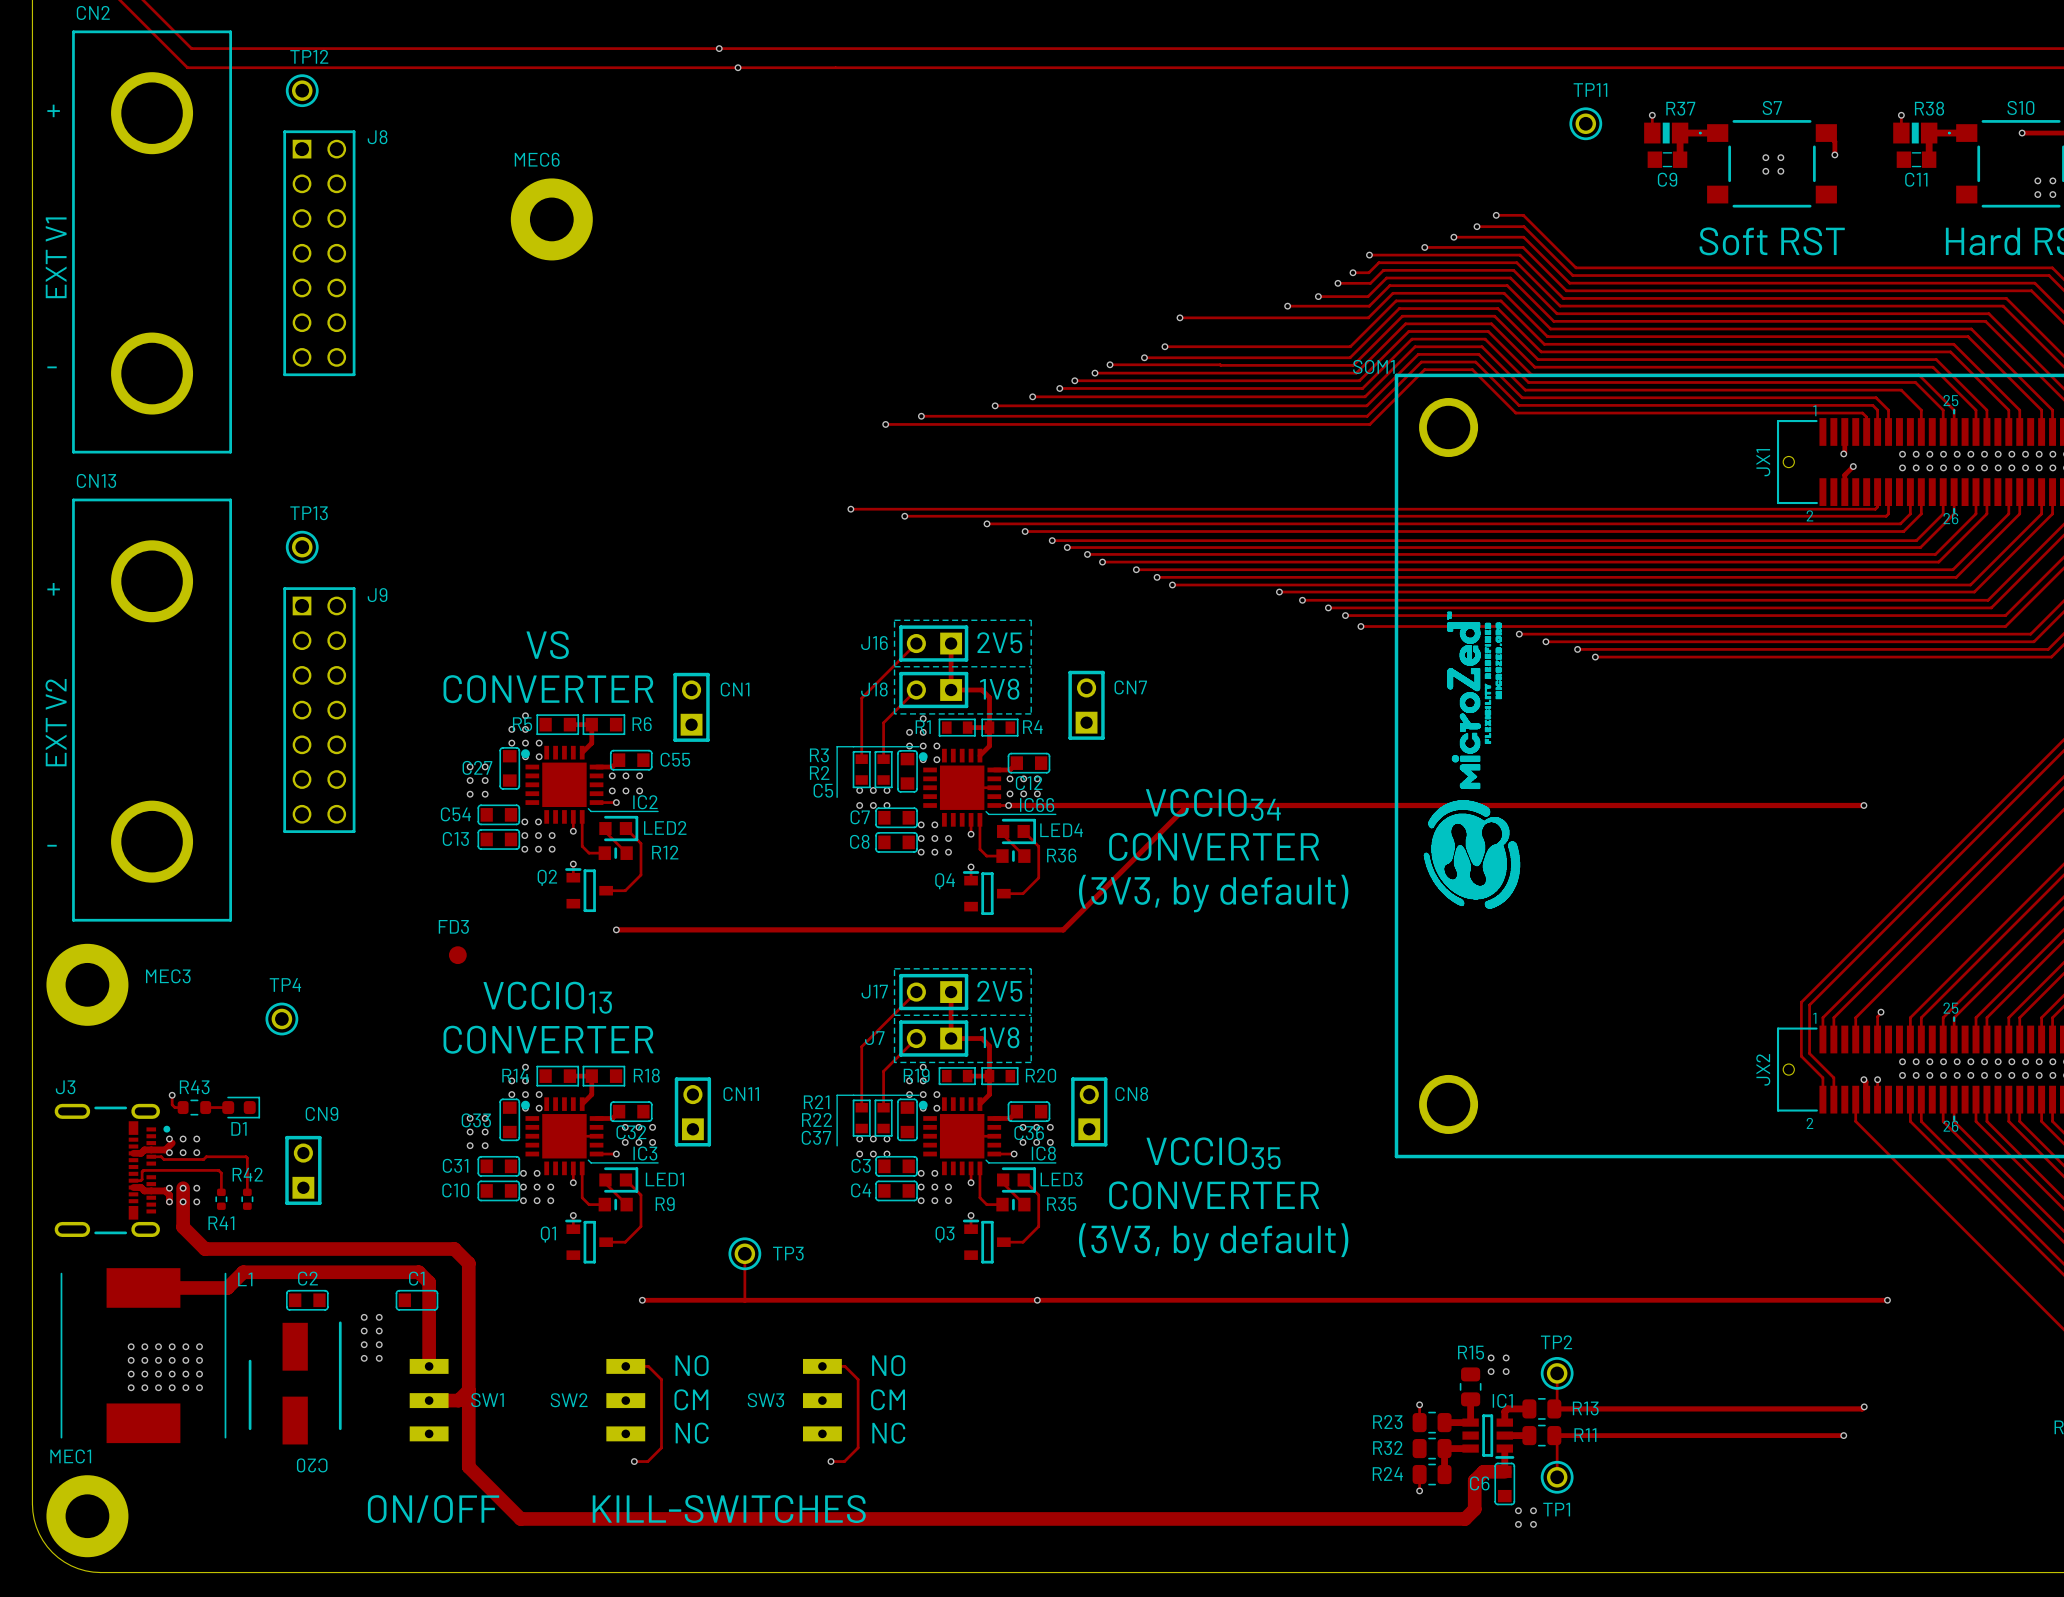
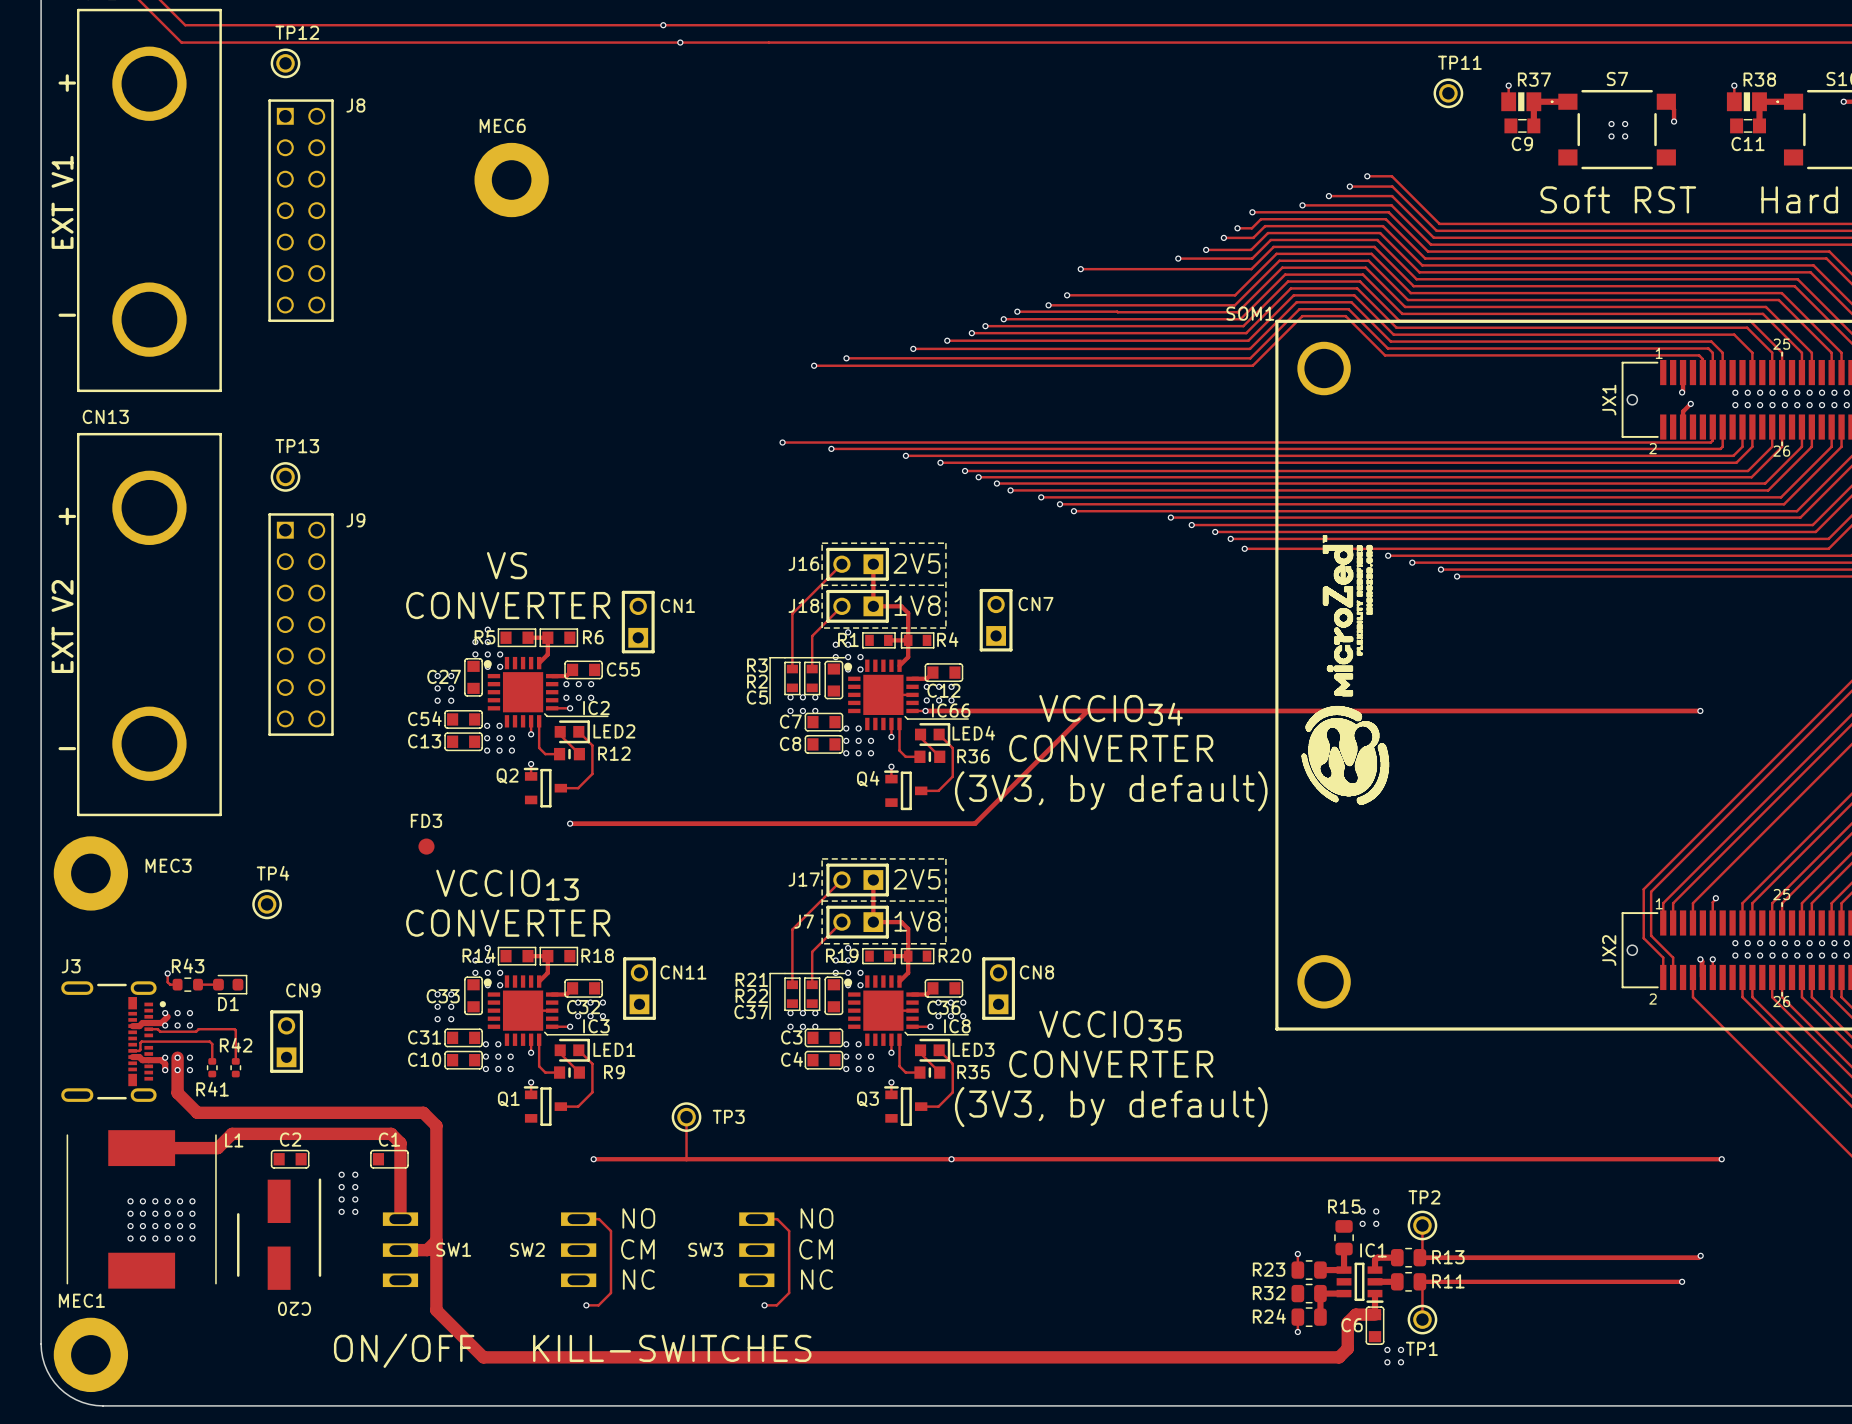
SW1 footprint: [409, 1358, 449, 1442] -> [382, 1212, 419, 1288]
SW2 footprint: [606, 1358, 646, 1442] -> [561, 1212, 597, 1288]
SW3 footprint: [803, 1358, 842, 1442] -> [739, 1212, 775, 1288]

